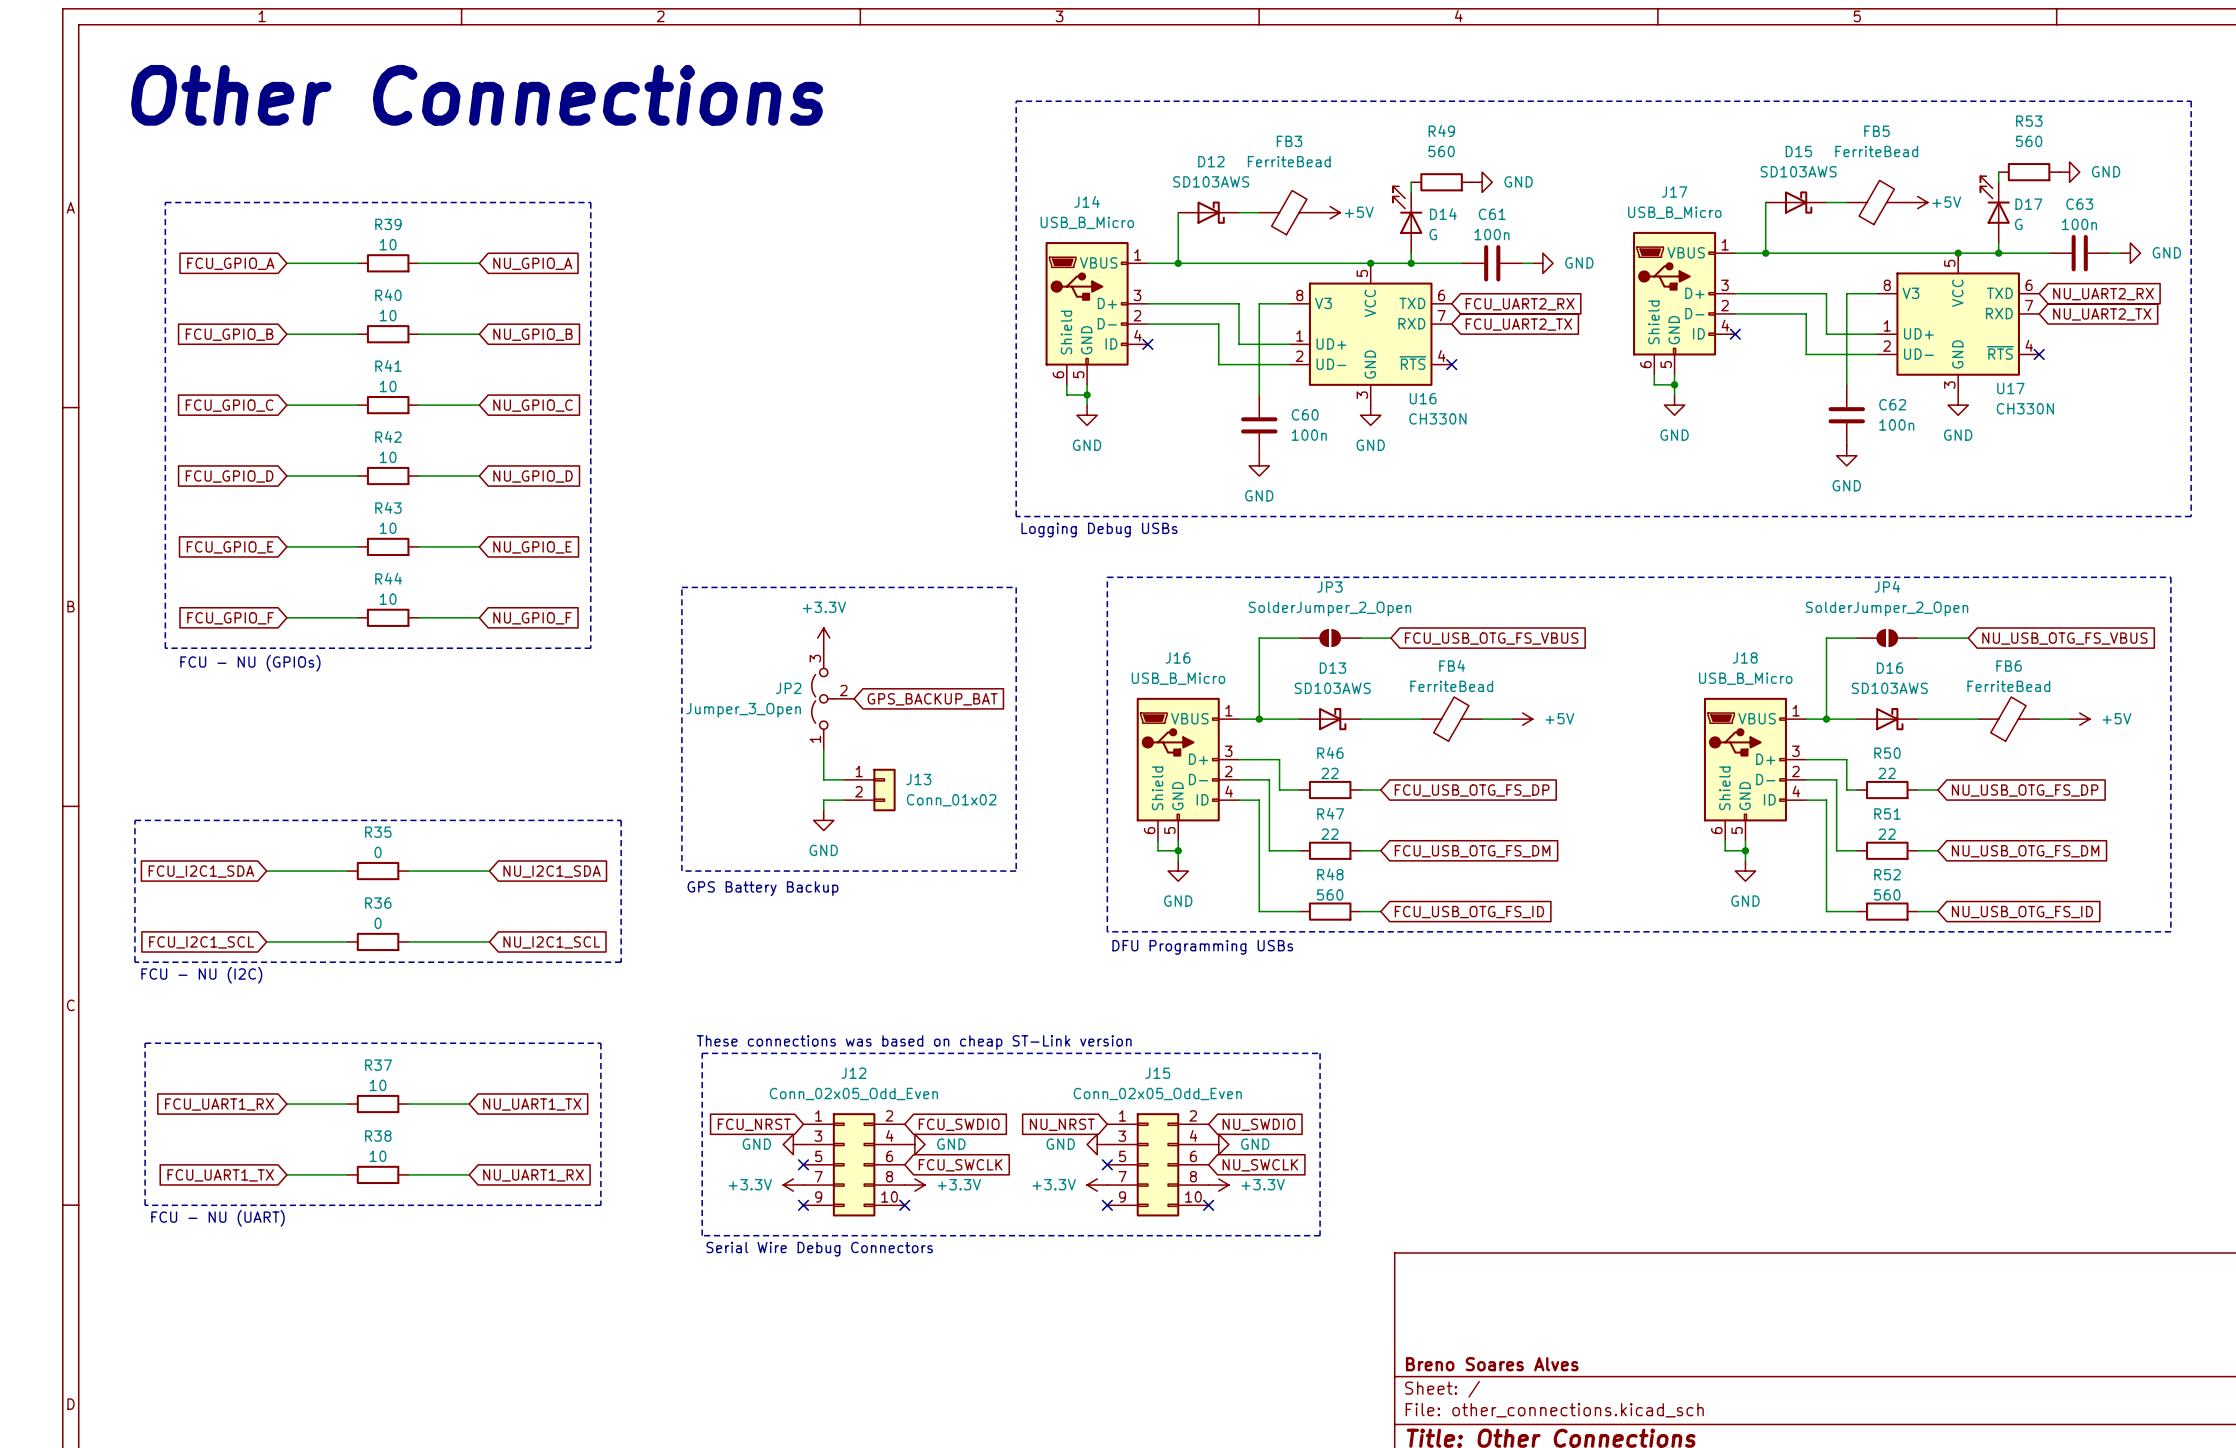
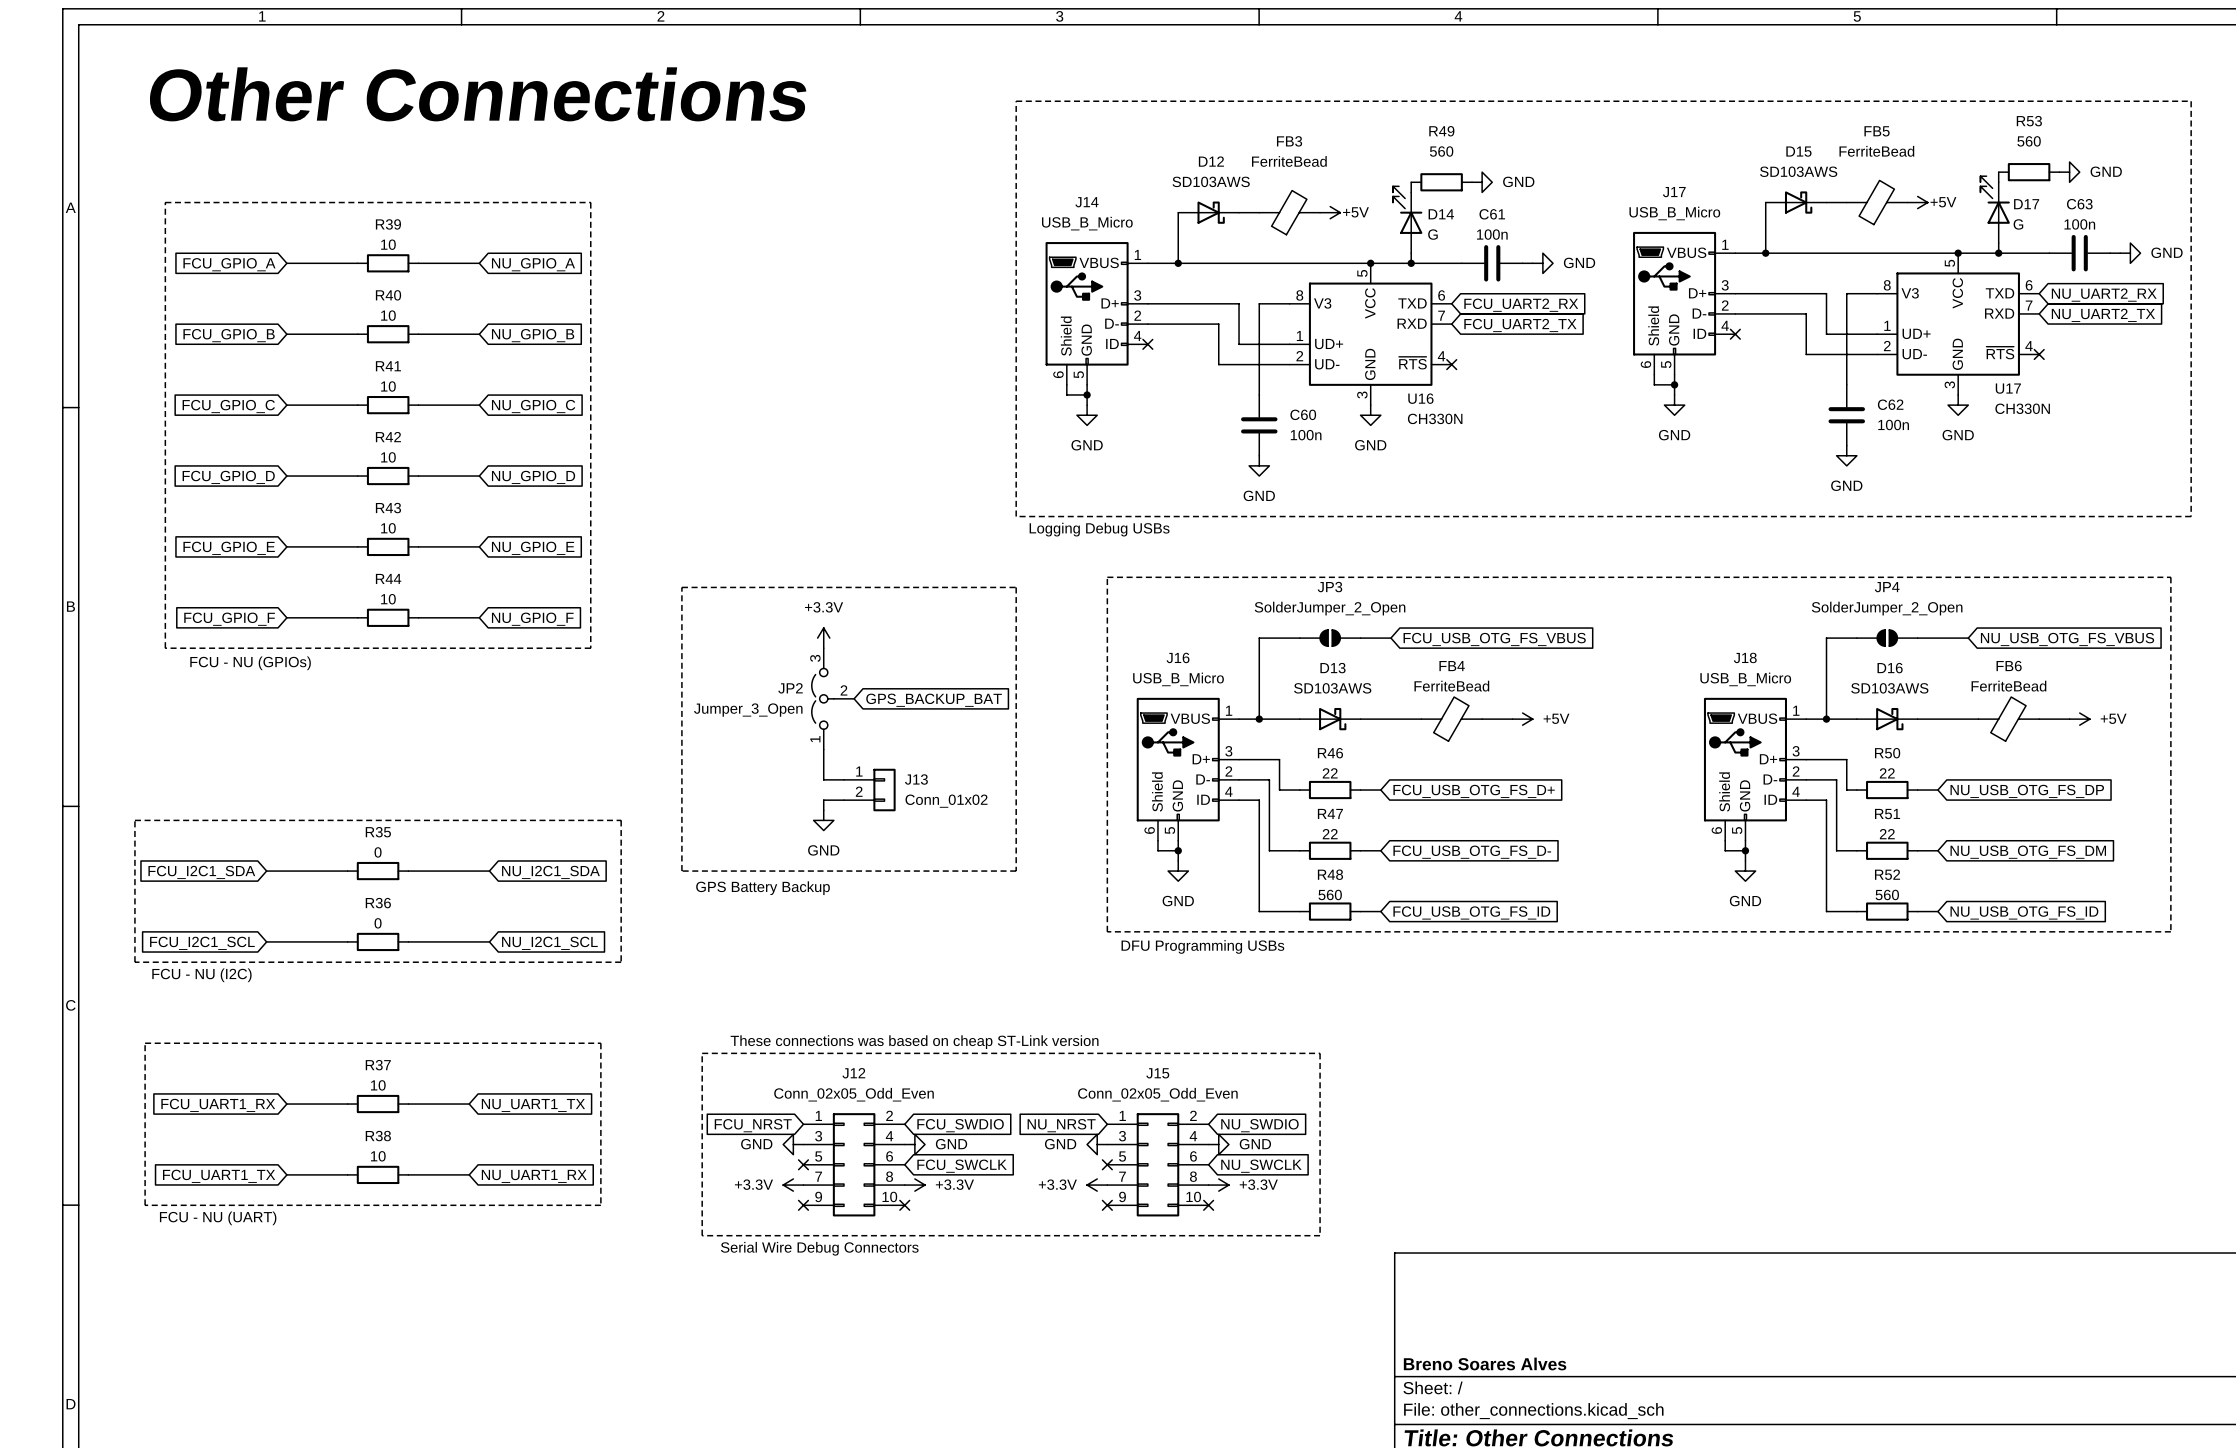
global label: FCU_USB_OTG_FS_DP (1472, 790) -> FCU_USB_OTG_FS_D+ (1474, 791)
global label: FCU_USB_OTG_FS_DM (1472, 851) -> FCU_USB_OTG_FS_D- (1472, 852)

